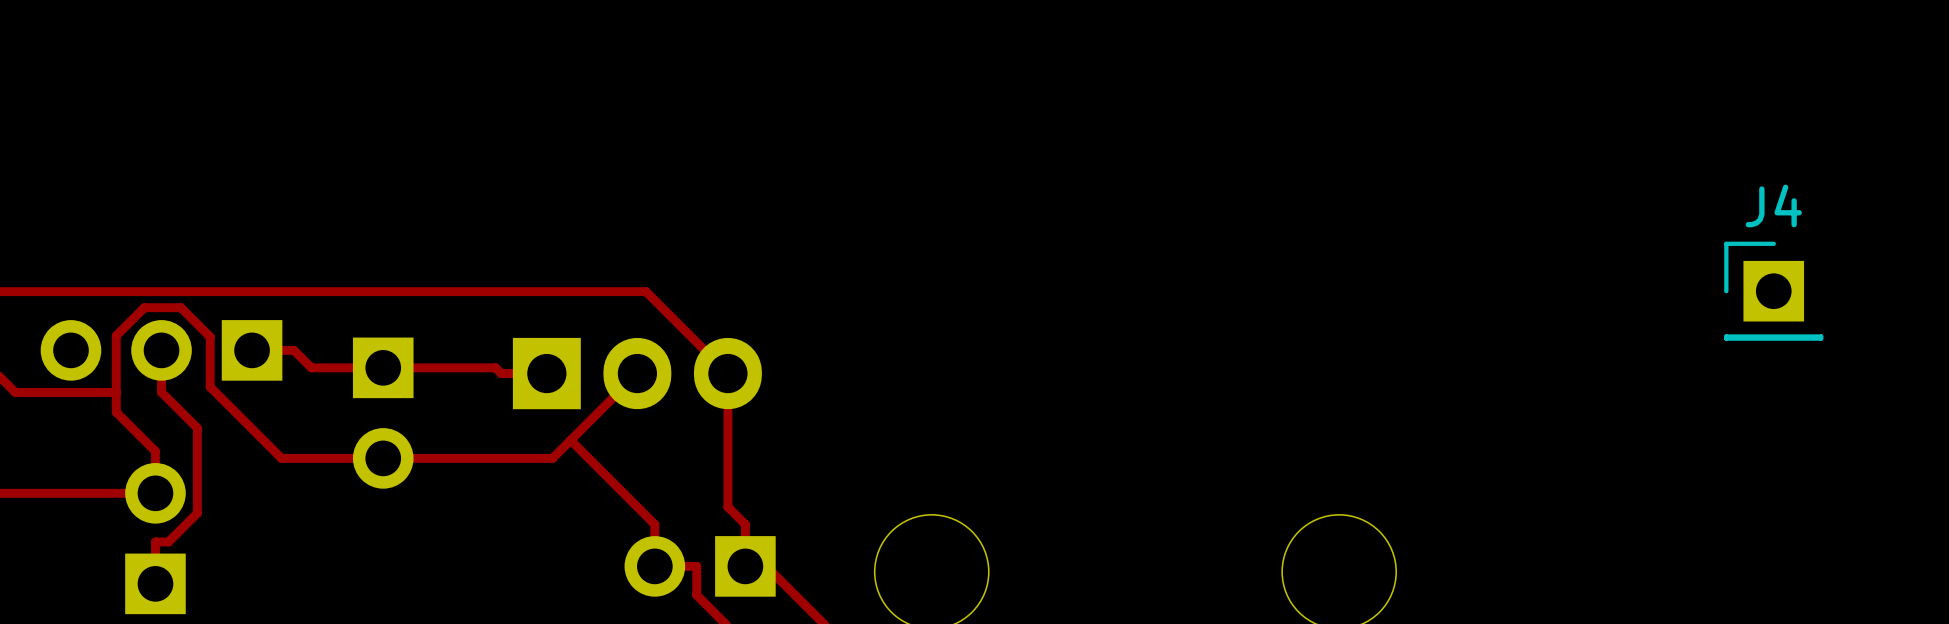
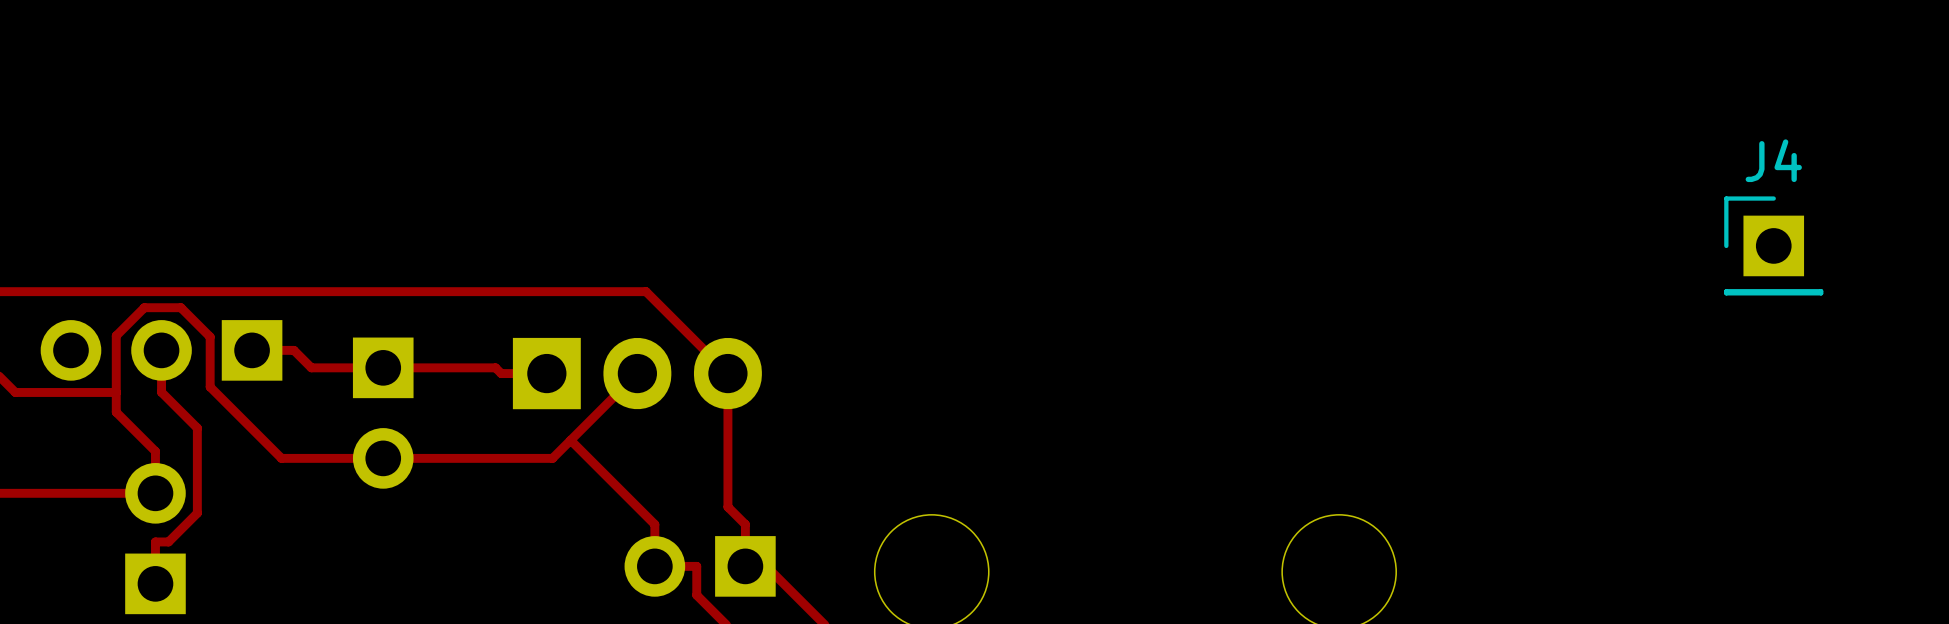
J4 position: (1773, 291) -> (1773, 245)

